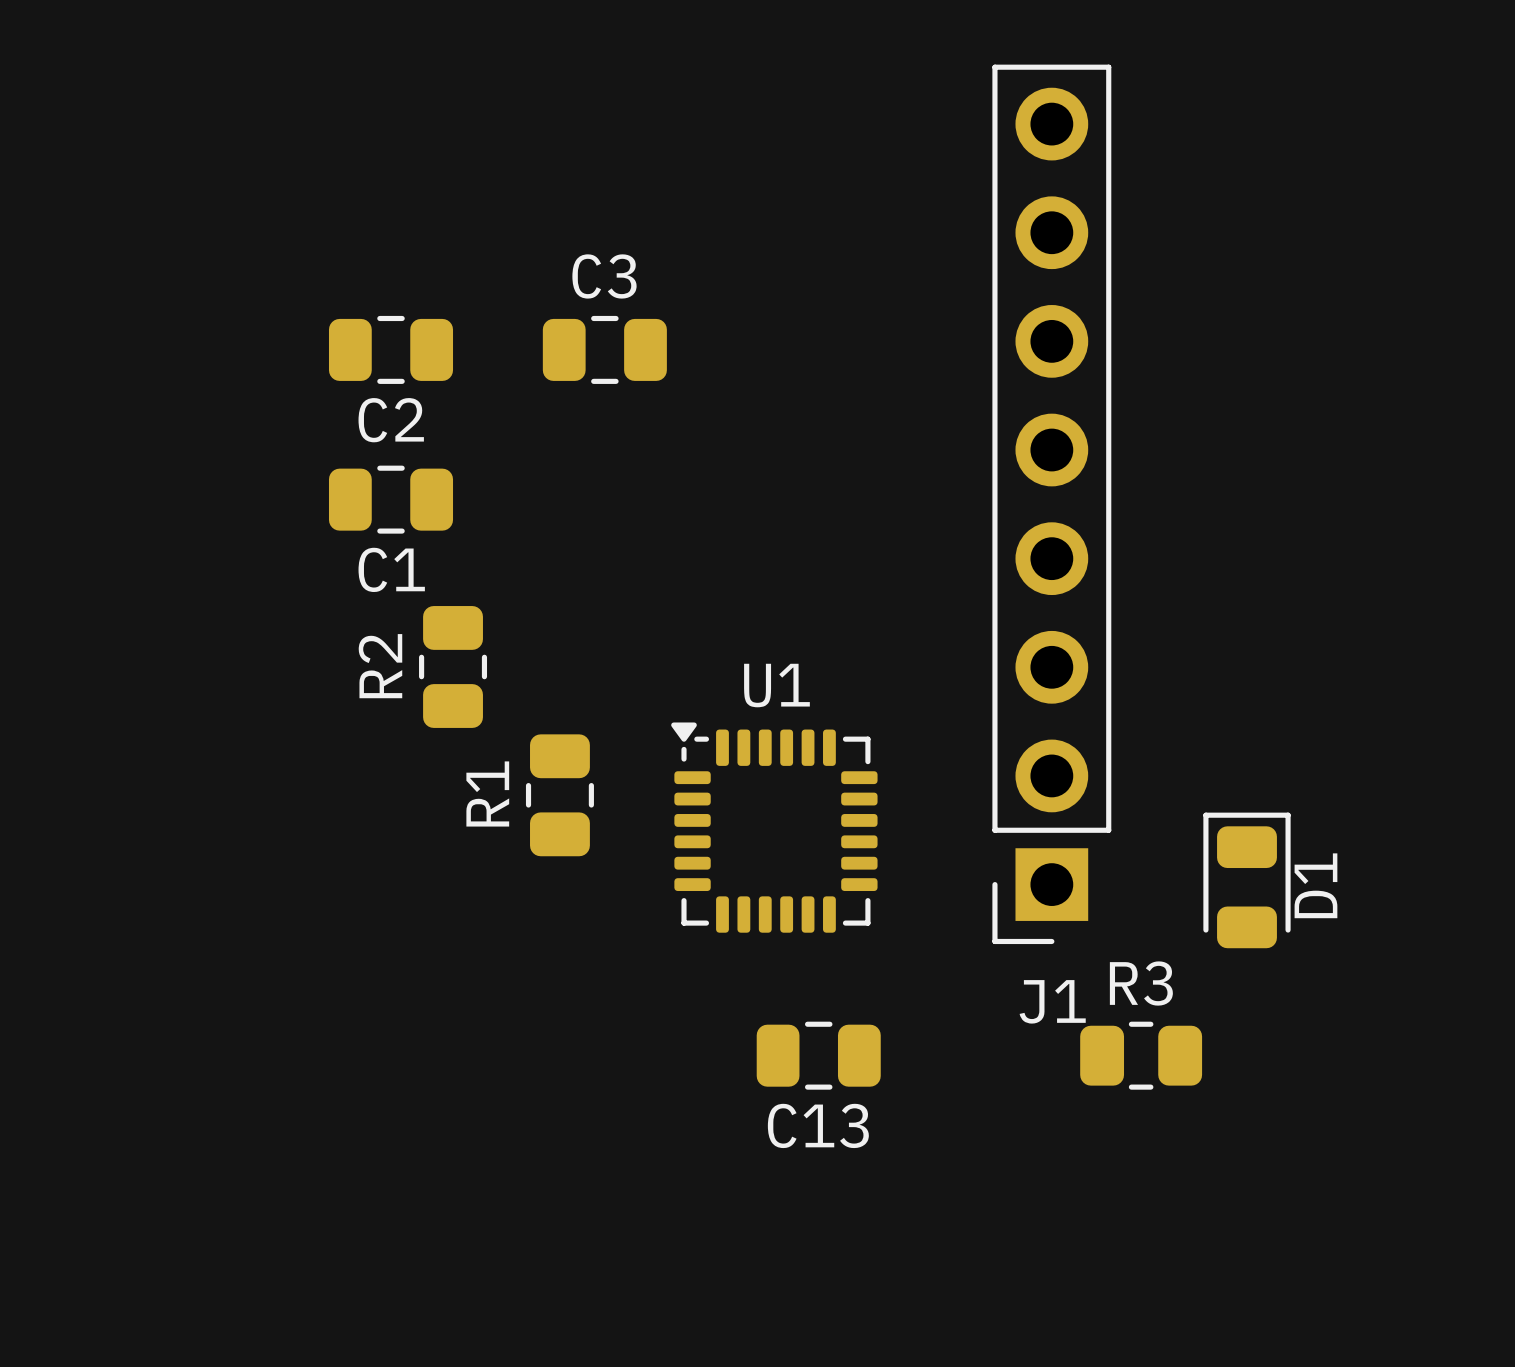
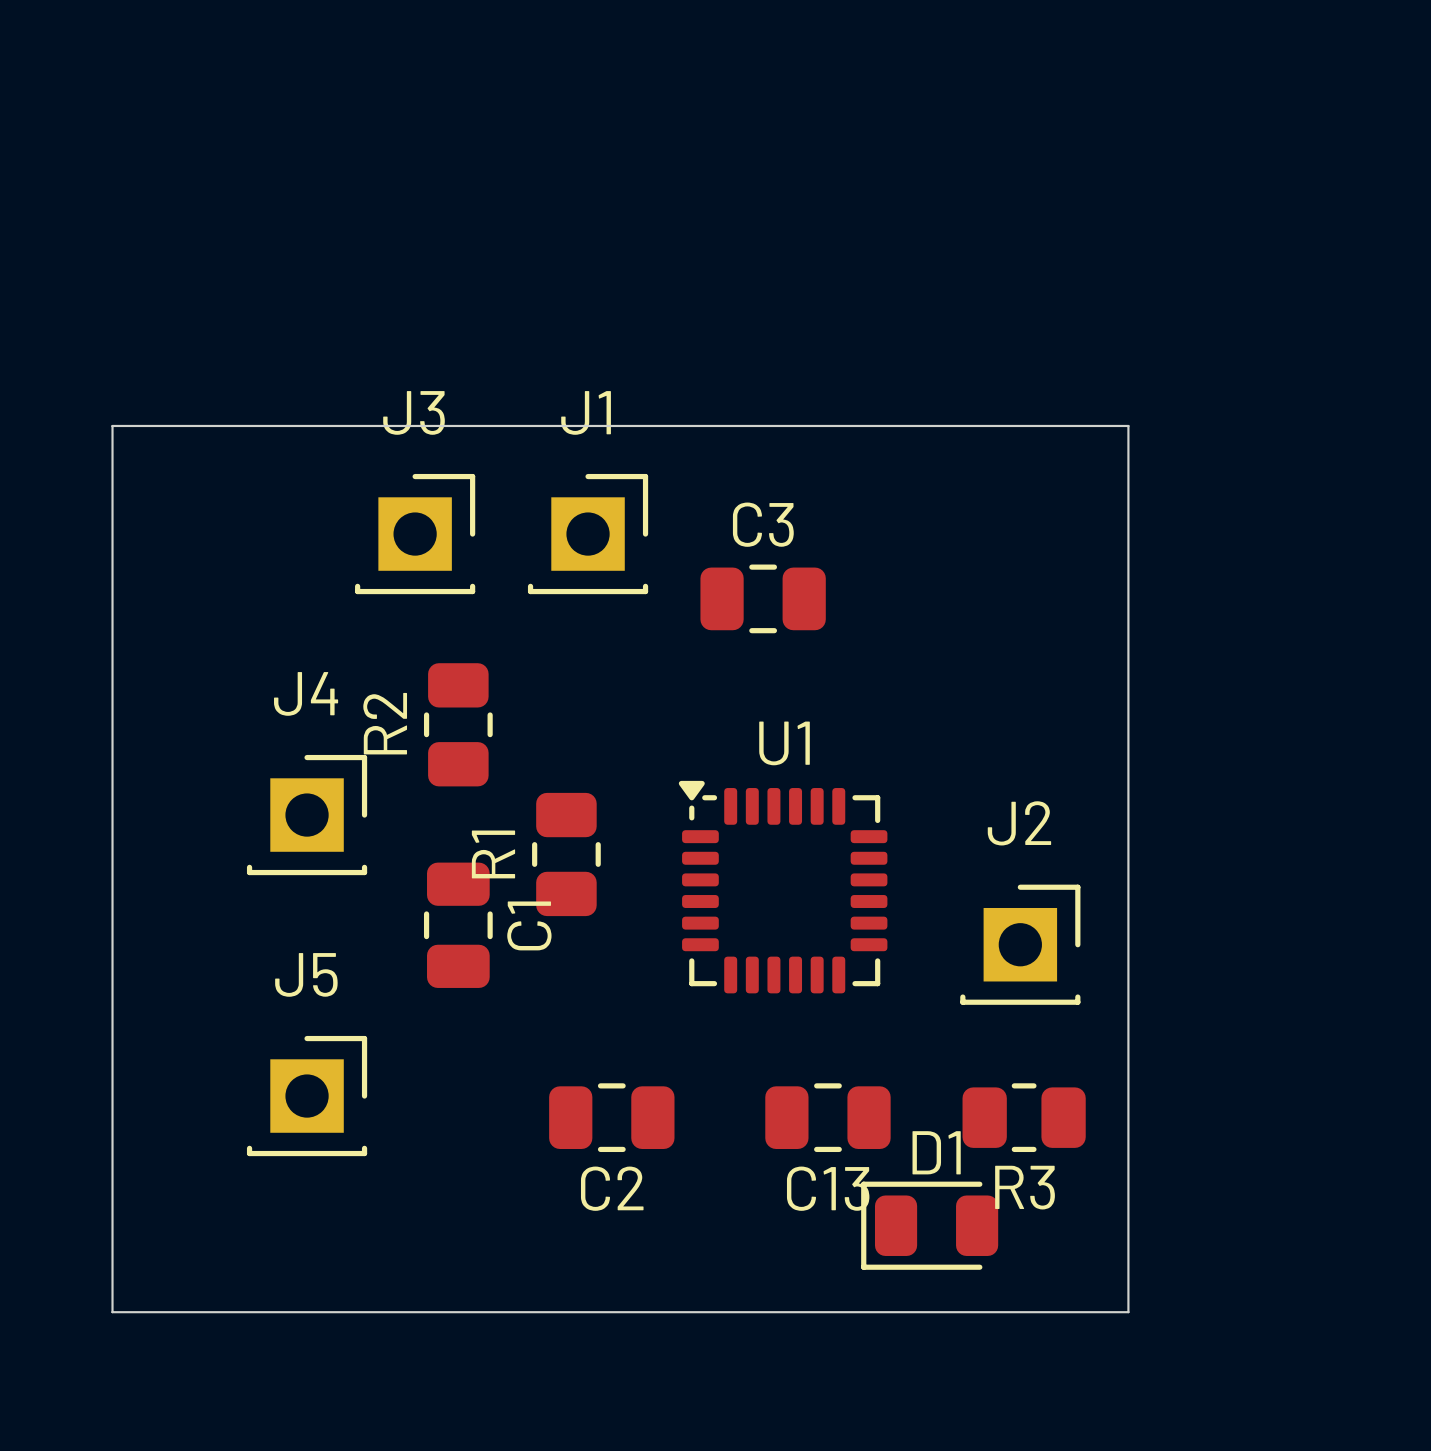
J1 footprint: [992, 64, 1112, 945] -> [527, 473, 649, 595]
C2 position: (391, 349) -> (611, 1117)
C3 position: (604, 349) -> (763, 598)
board edge: none -> (112, 425) (112, 1312) (1128, 1312) (1128, 425) (112, 425)
J3: none -> (415, 534)
C1 rotation: 0° (391, 499) -> 90° clockwise (458, 925)
C1 position: (391, 499) -> (458, 925)
C1 name position: C1 (391, 569) -> C1 (529, 925)
J4: none -> (307, 815)
D1 rotation: 0° (1246, 880) -> 90° counterclockwise (929, 1225)
D1 position: (1246, 880) -> (929, 1225)
J2: none -> (1020, 944)
R3 name position: R3 (1141, 983) -> R3 (1025, 1187)
J1 name position: J1 (1052, 1001) -> J1 (586, 412)
J5: none -> (307, 1096)
R3 position: (1141, 1055) -> (1024, 1117)

